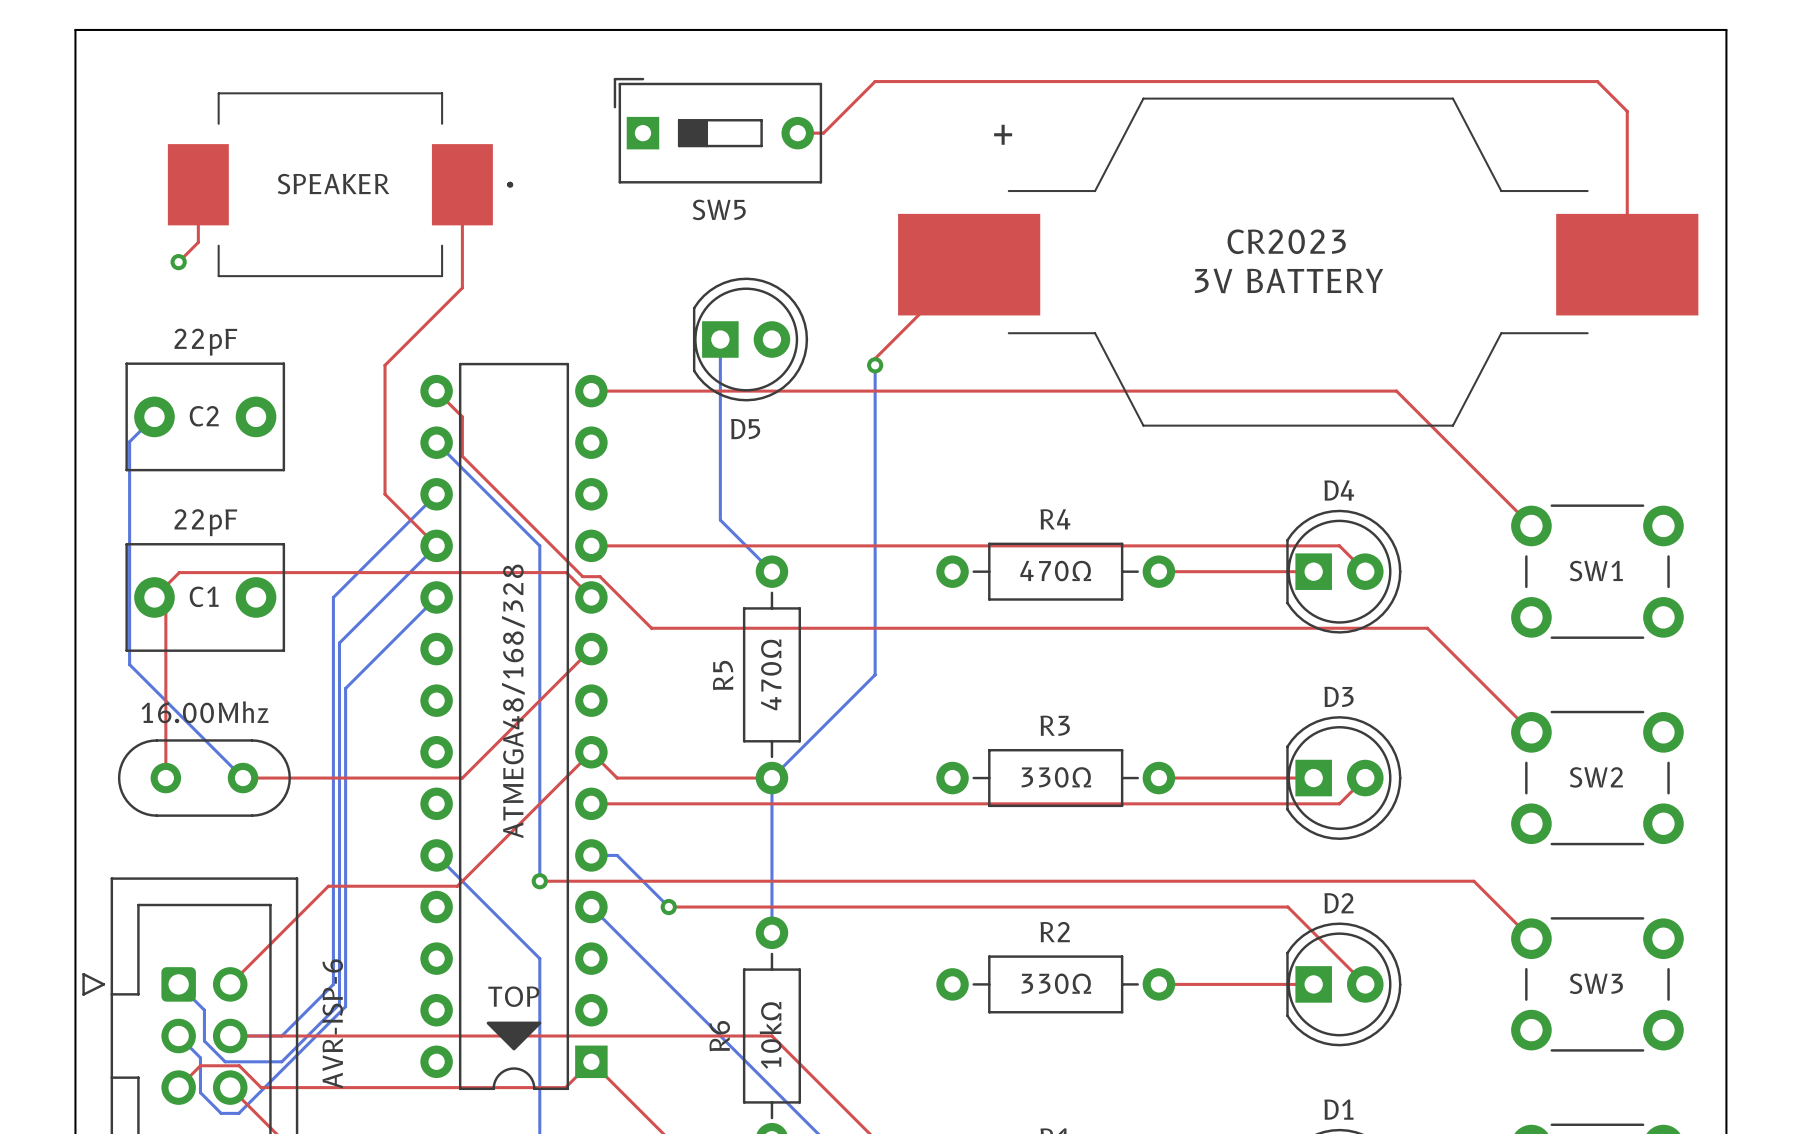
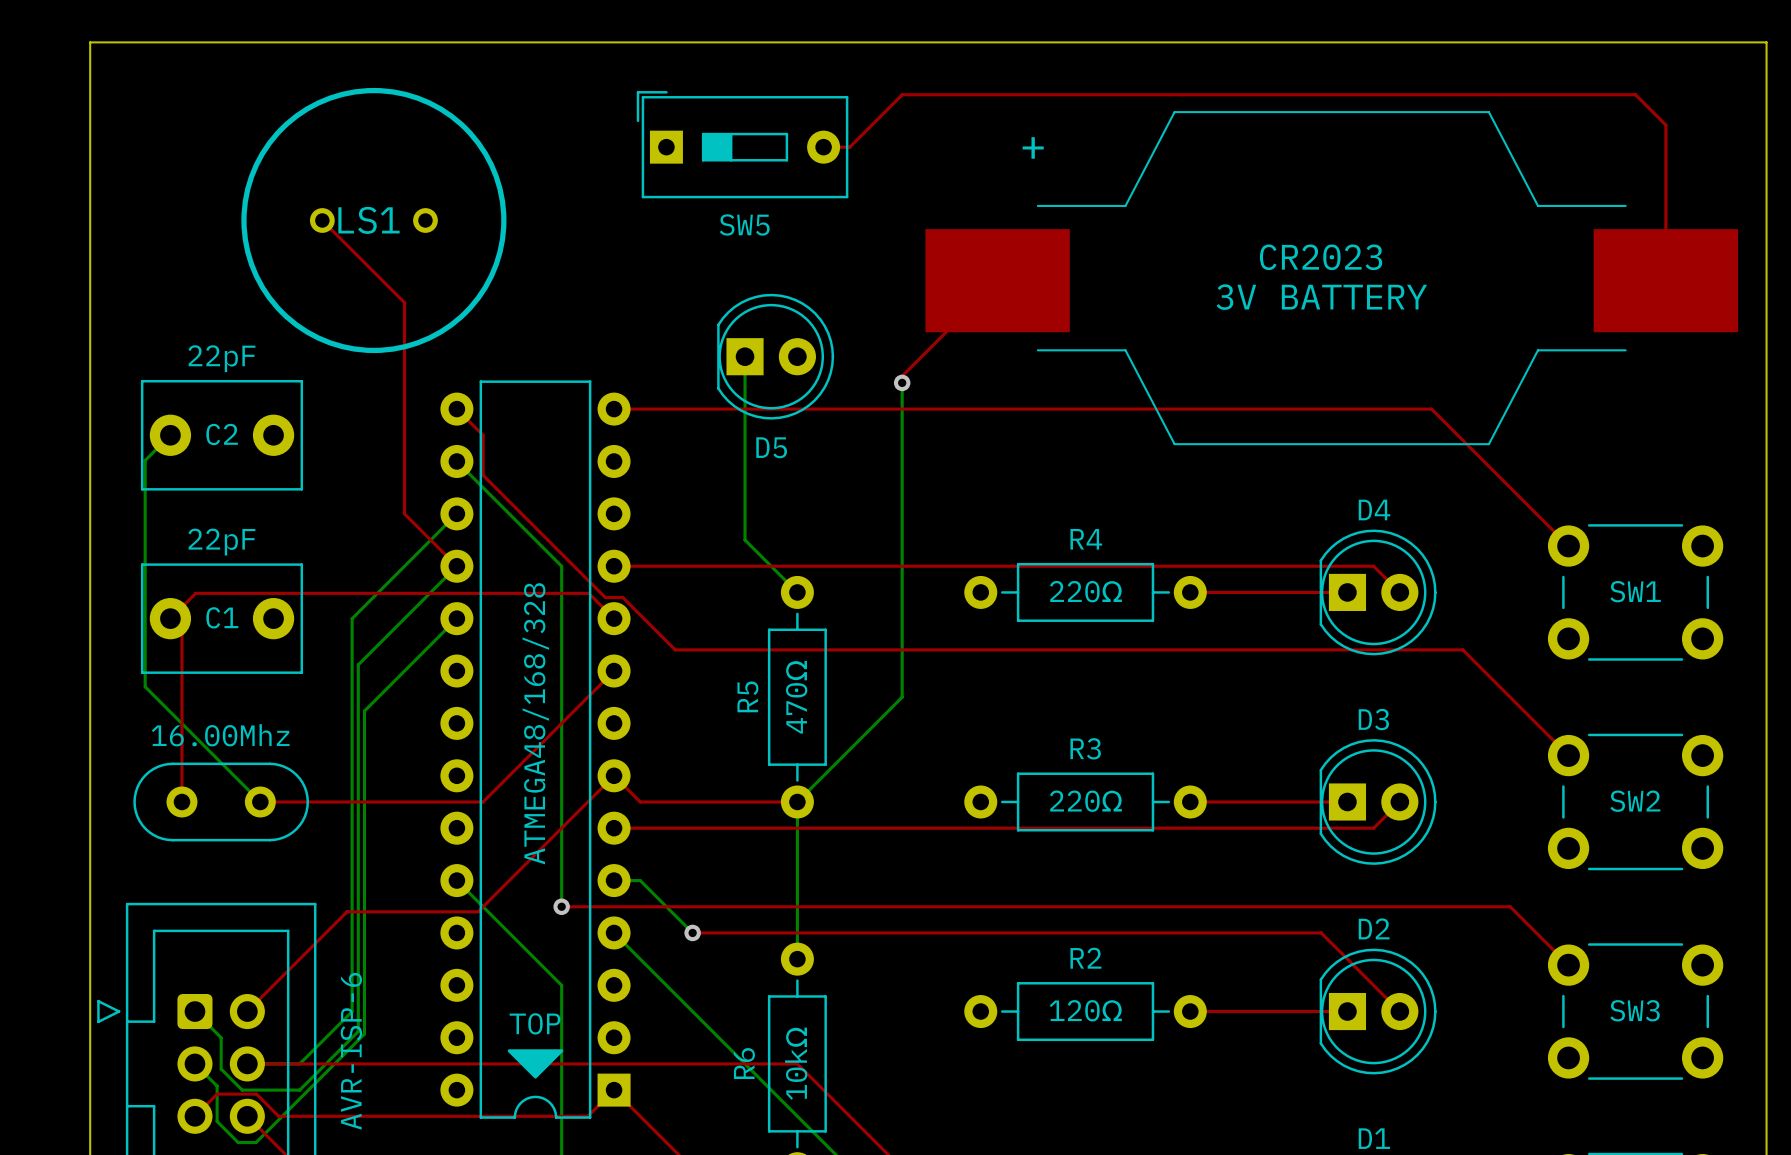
top track: (198, 184) (198, 242) (178, 262) -> none
text: SPEAKER (333, 184) -> none
part: (340, 184) -> none
top track: (462, 184) (462, 287) (385, 365) -> (322, 220) (404, 302) (404, 382)
LS1: none -> (373, 220)
via: (178, 262) -> none
R4 value: 470Ω (1055, 571) -> 220Ω (1085, 591)
R3 value: 330Ω (1056, 777) -> 220Ω (1085, 801)
R2 value: 330Ω (1056, 983) -> 120Ω (1085, 1010)

